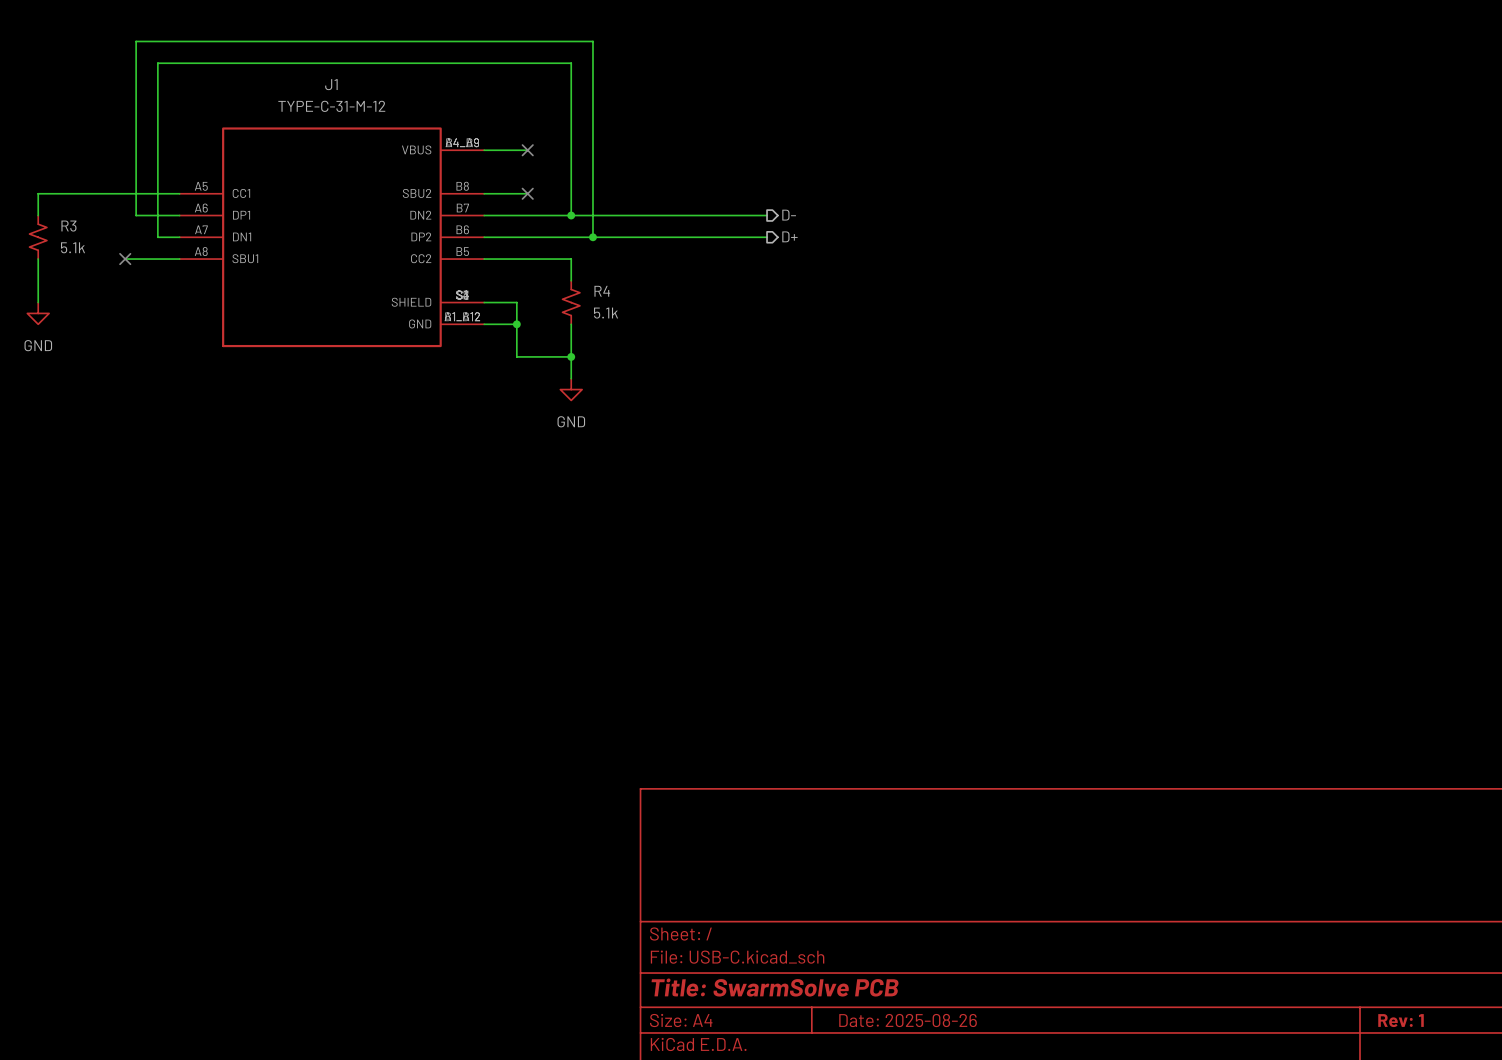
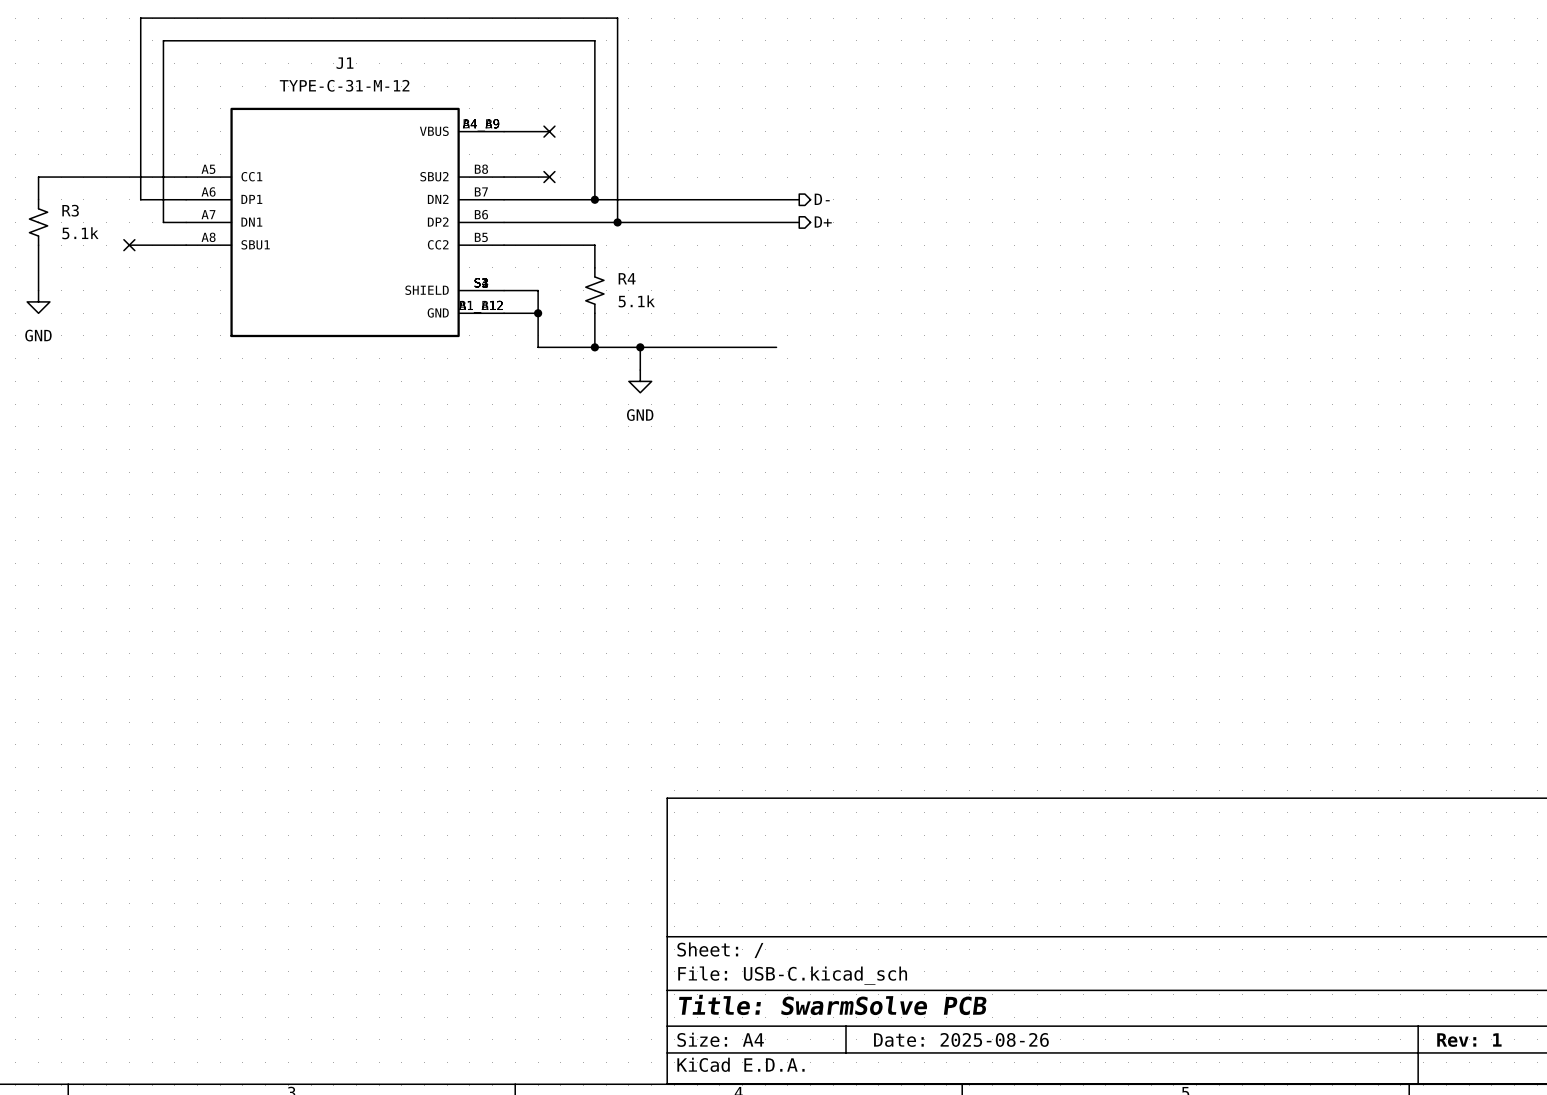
wire: (571, 356) (571, 378) -> (594, 347) (776, 347)
wire: none -> (640, 347) (640, 370)
junction: none -> (640, 347)
power symbol position: GND (571, 389) -> GND (640, 381)

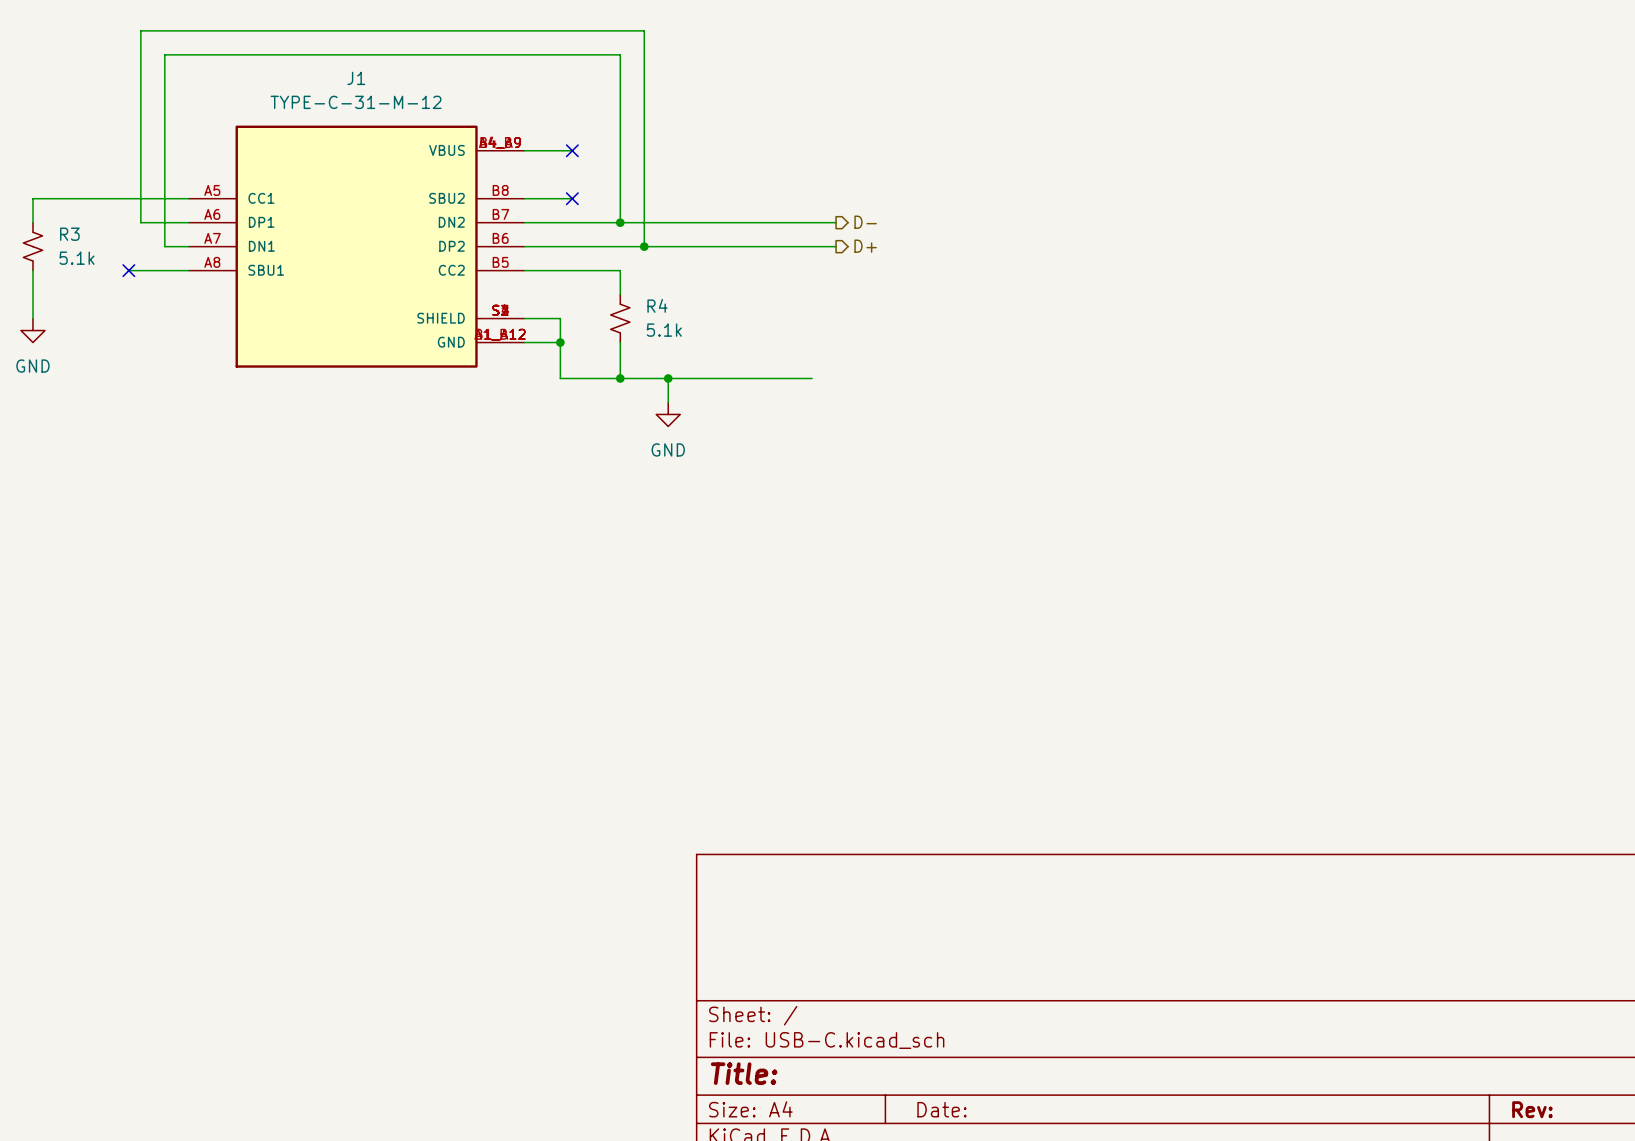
title block: Title: SwarmSolve PCB (832, 1004) -> Title: (744, 1073)
title block: Date: 2025-08-26 (961, 1039) -> Date: (941, 1109)
title block: Rev: 1 (1469, 1040) -> Rev: (1532, 1109)

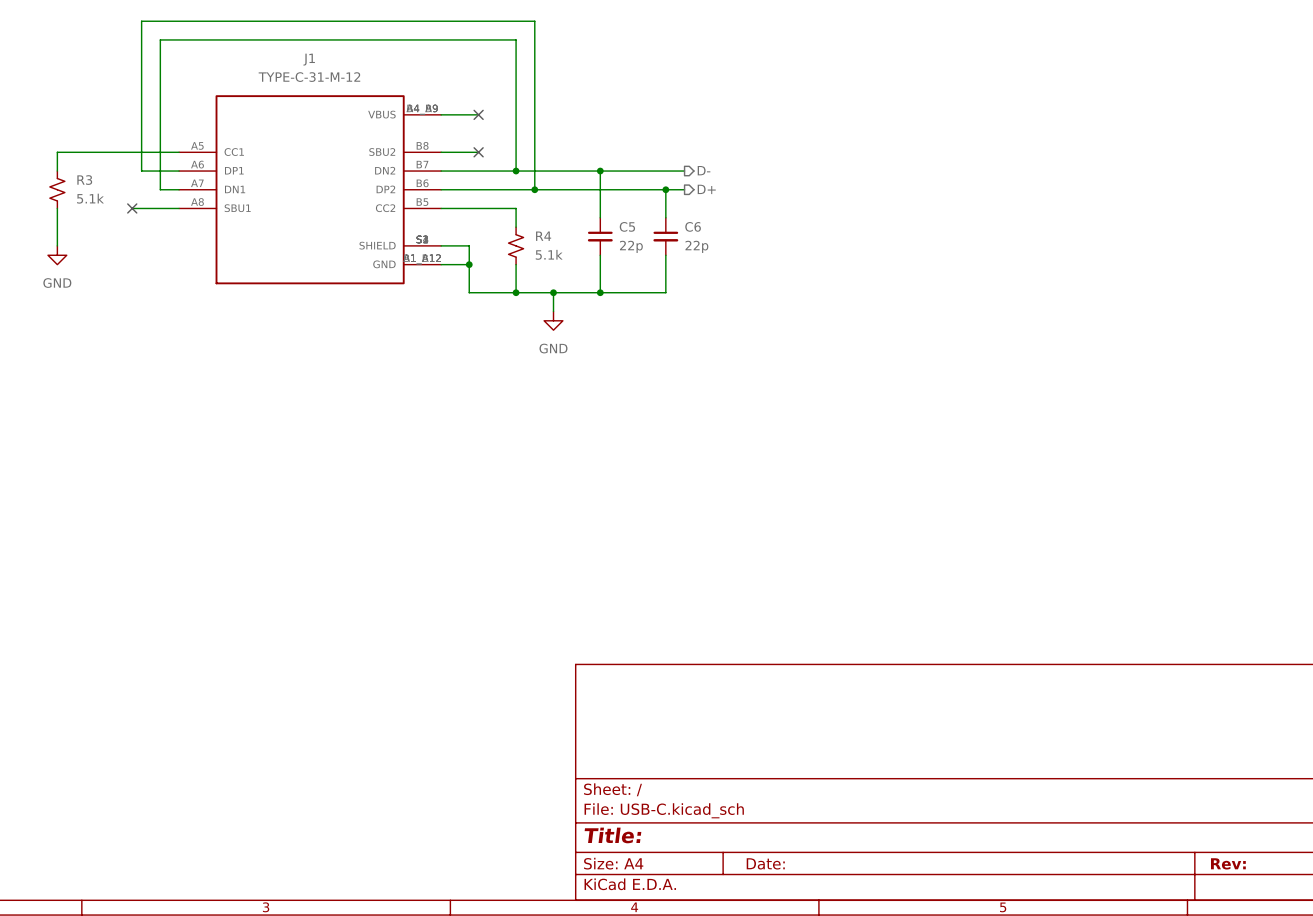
wire: none -> (600, 171) (600, 217)
junction: none -> (600, 171)
wire: none -> (665, 189) (665, 217)
junction: none -> (665, 189)
C5: none -> 22p (600, 236)
C6: none -> 22p (665, 236)
wire: none -> (600, 255) (600, 292)
wire: none -> (665, 255) (665, 292)
junction: none -> (600, 292)

